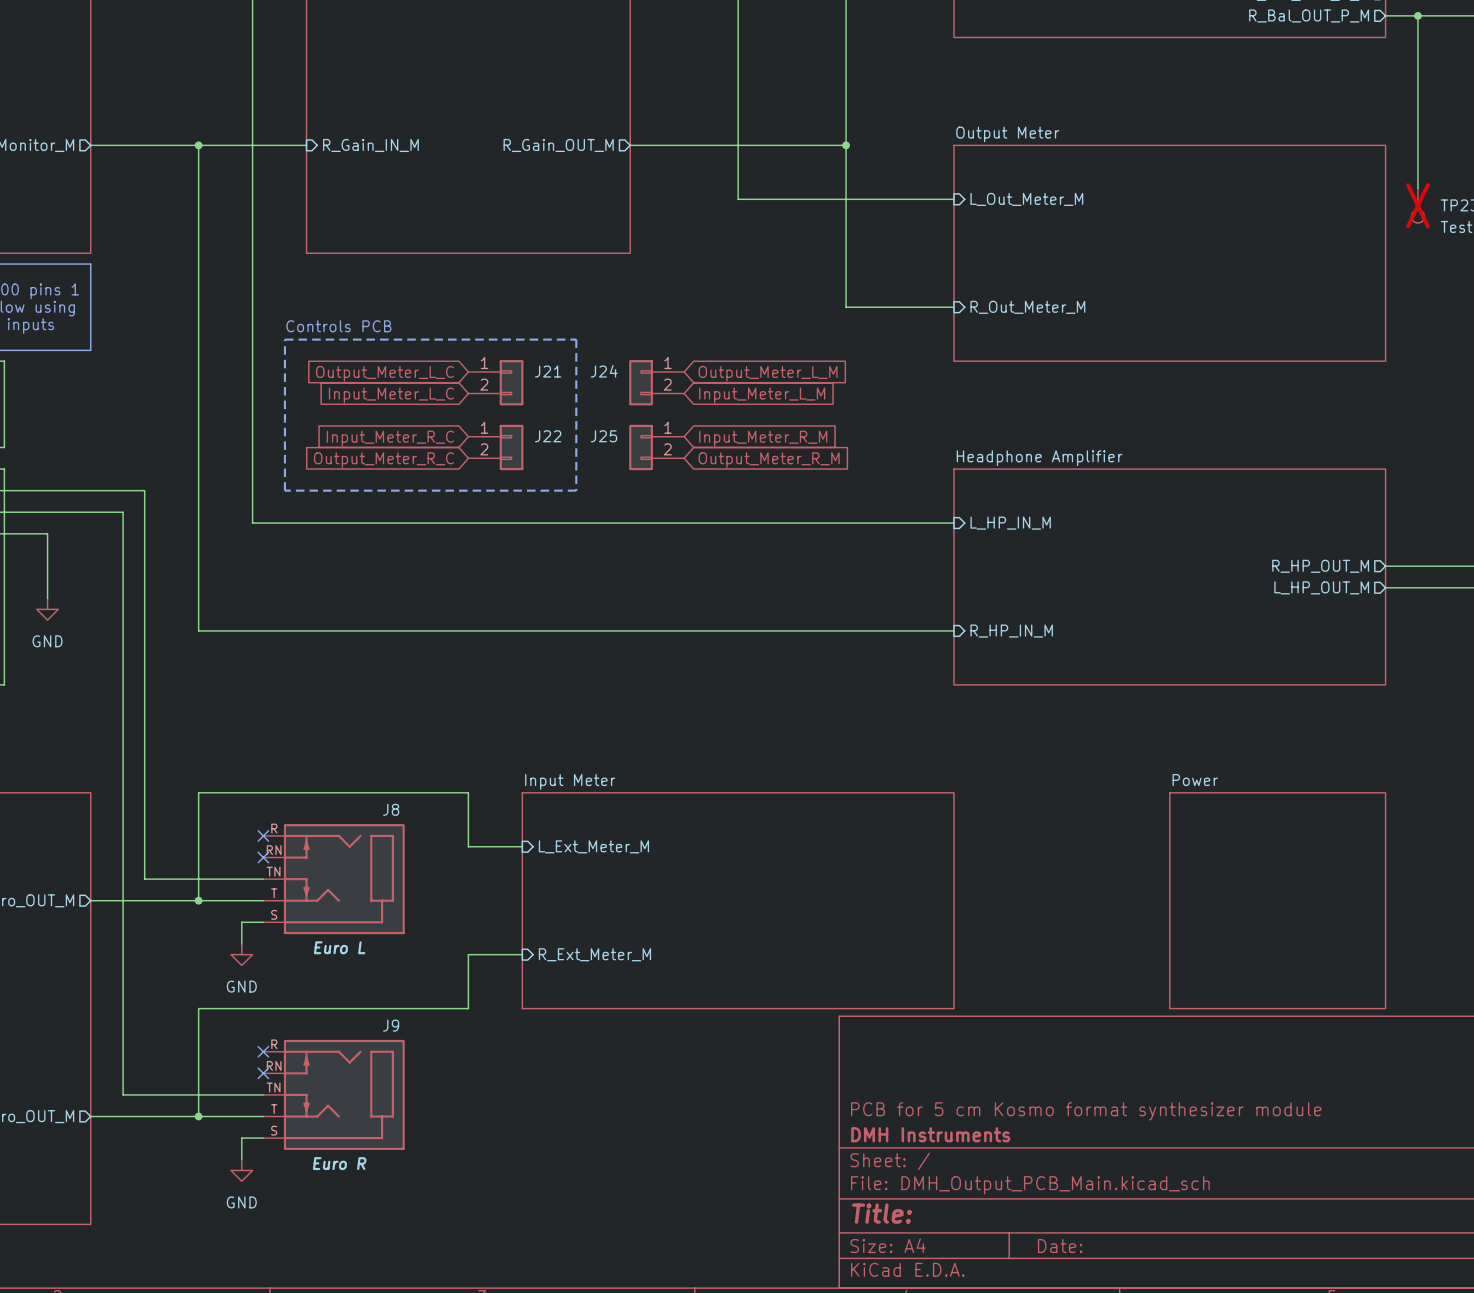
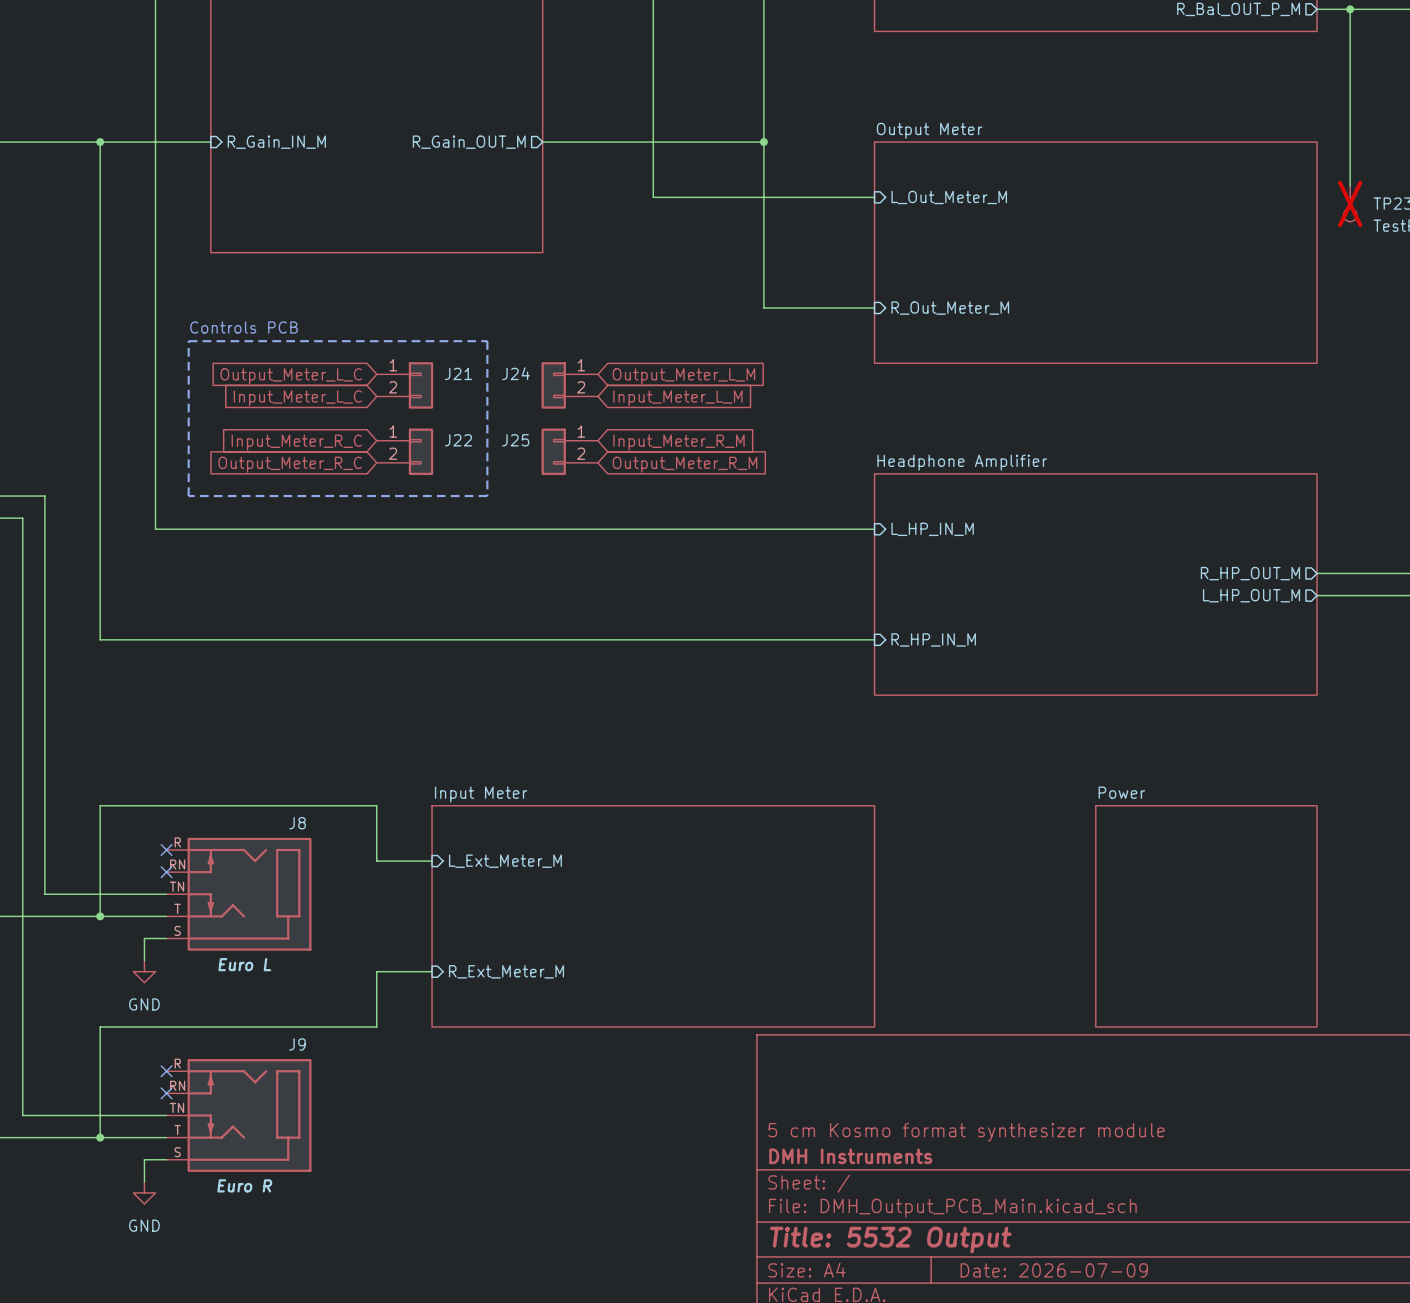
title block: PCB for 5 cm Kosmo format synthesizer module (1086, 1111) -> 5 cm Kosmo format synthesizer module (966, 1132)
title block: Title: (882, 1213) -> Title: 5532 Output (890, 1240)
title block: Date: (1060, 1246) -> Date: 2026-07-09 (1054, 1270)

